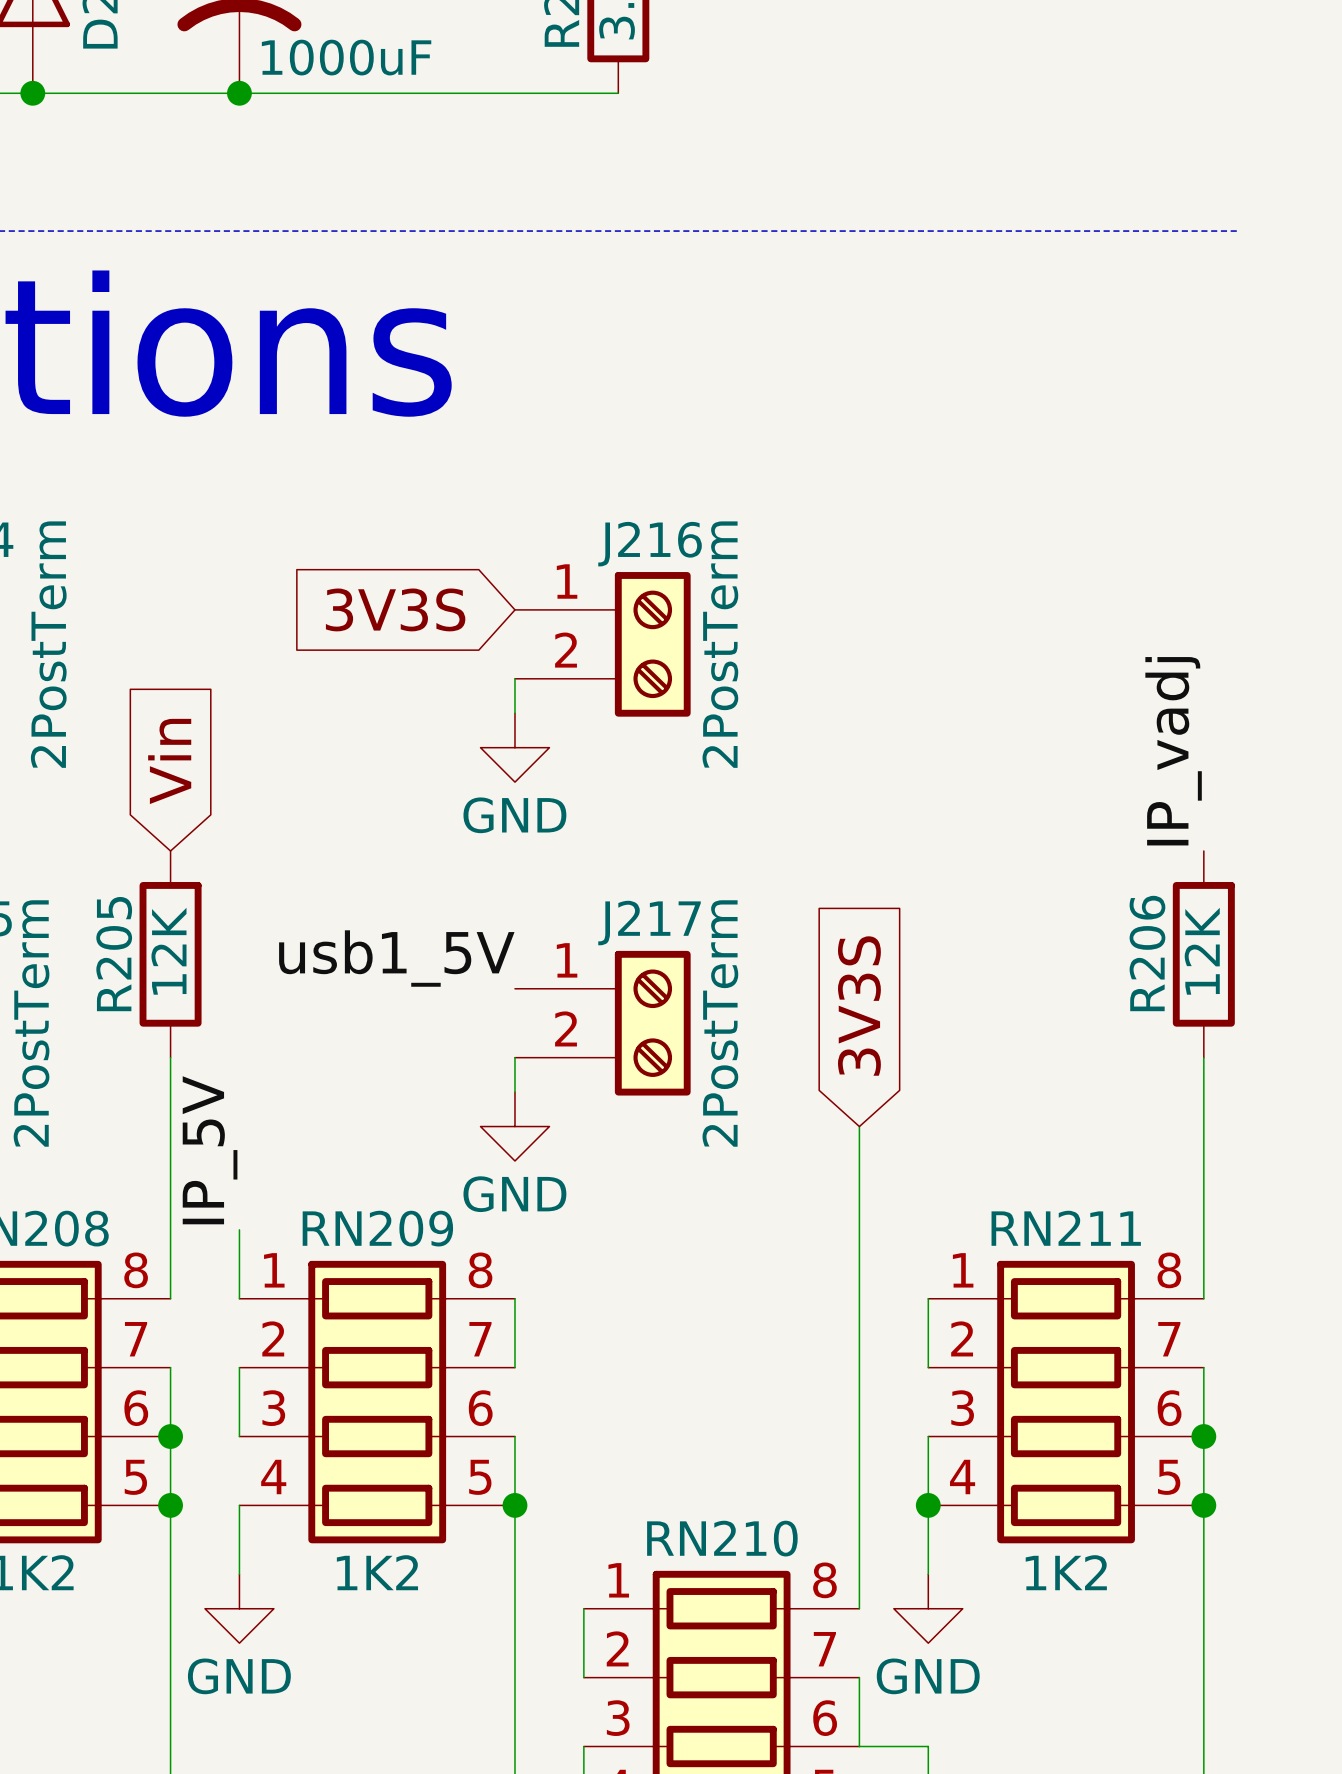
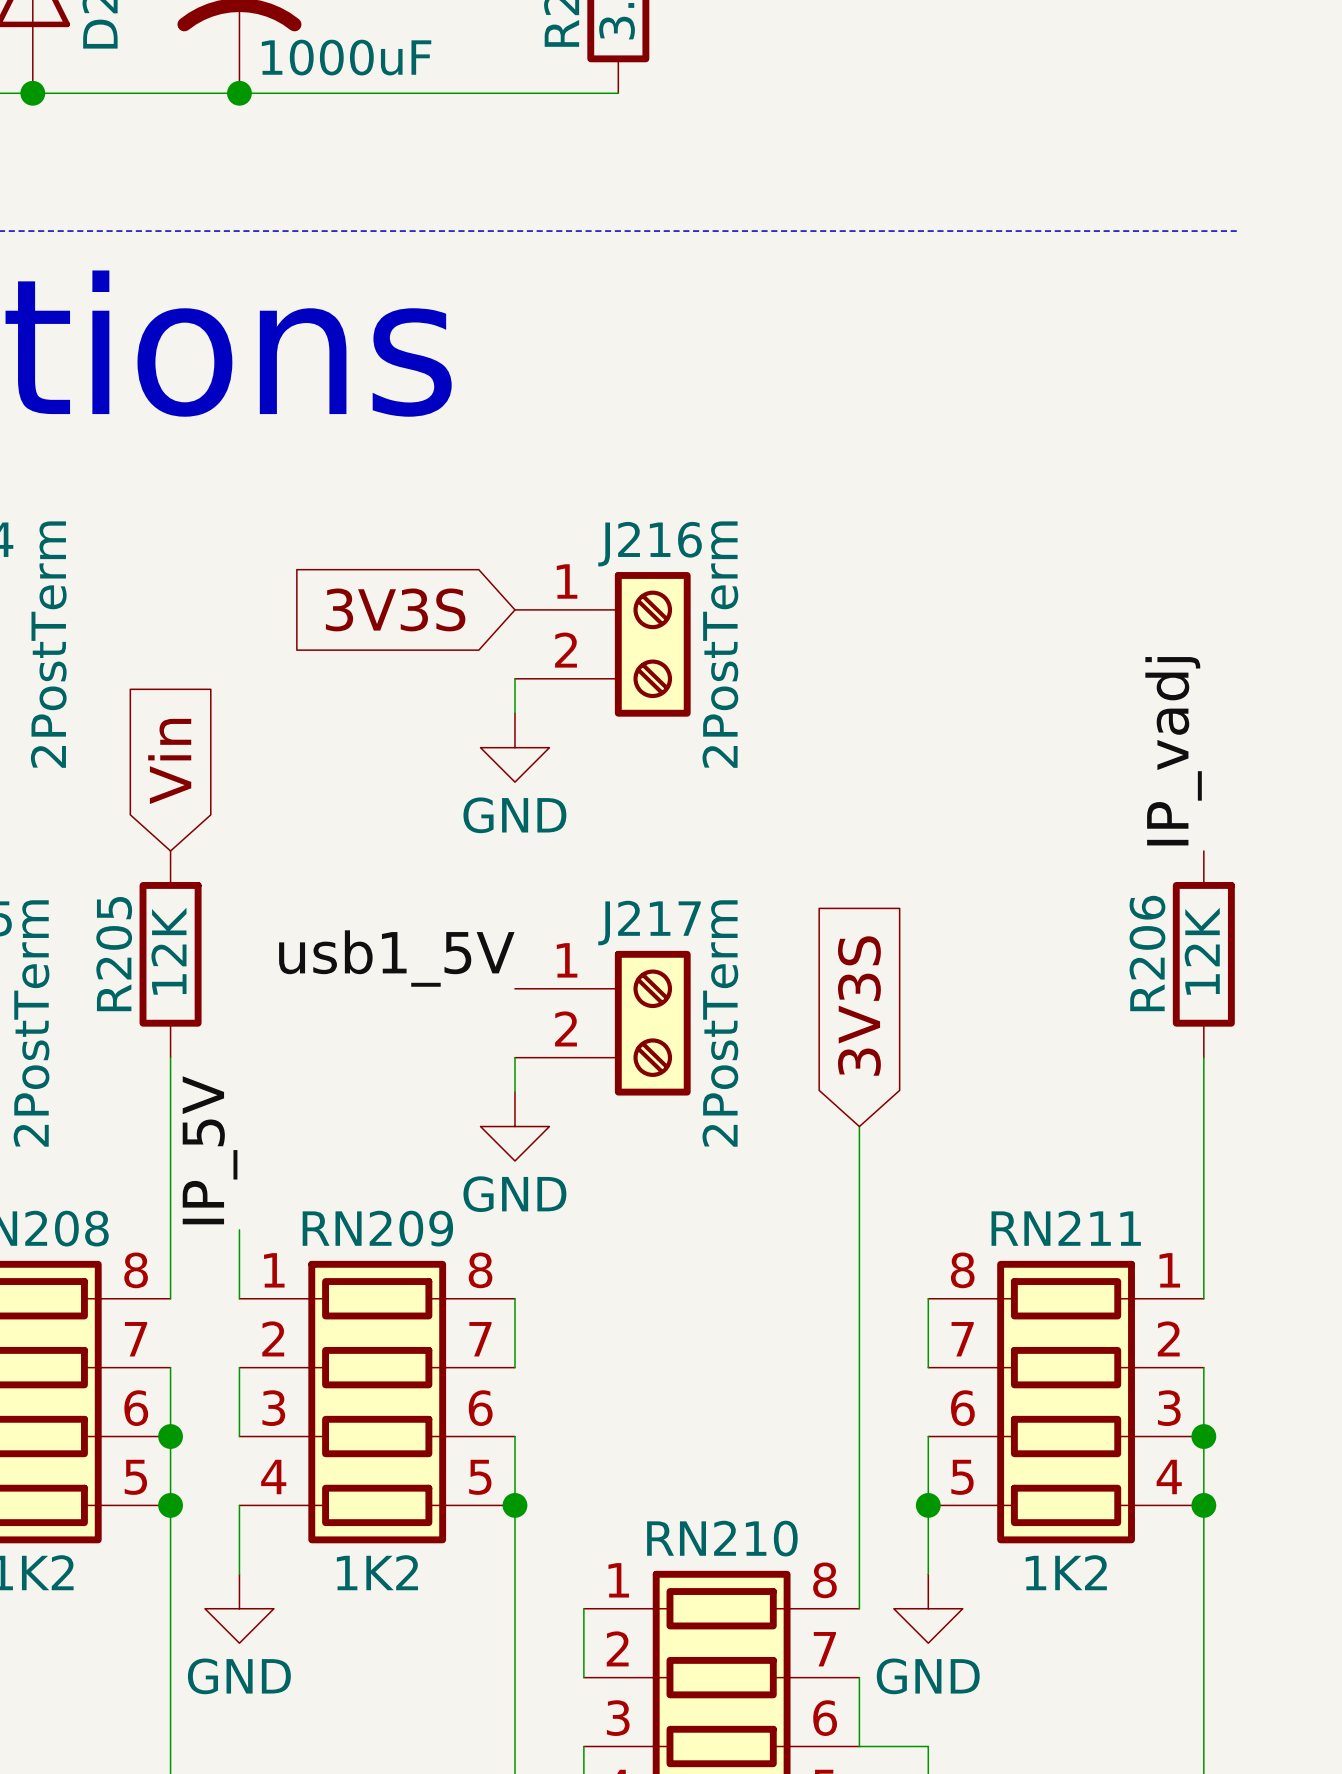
RN211 flip: as is (1066, 1402) -> left-right (1066, 1402)

